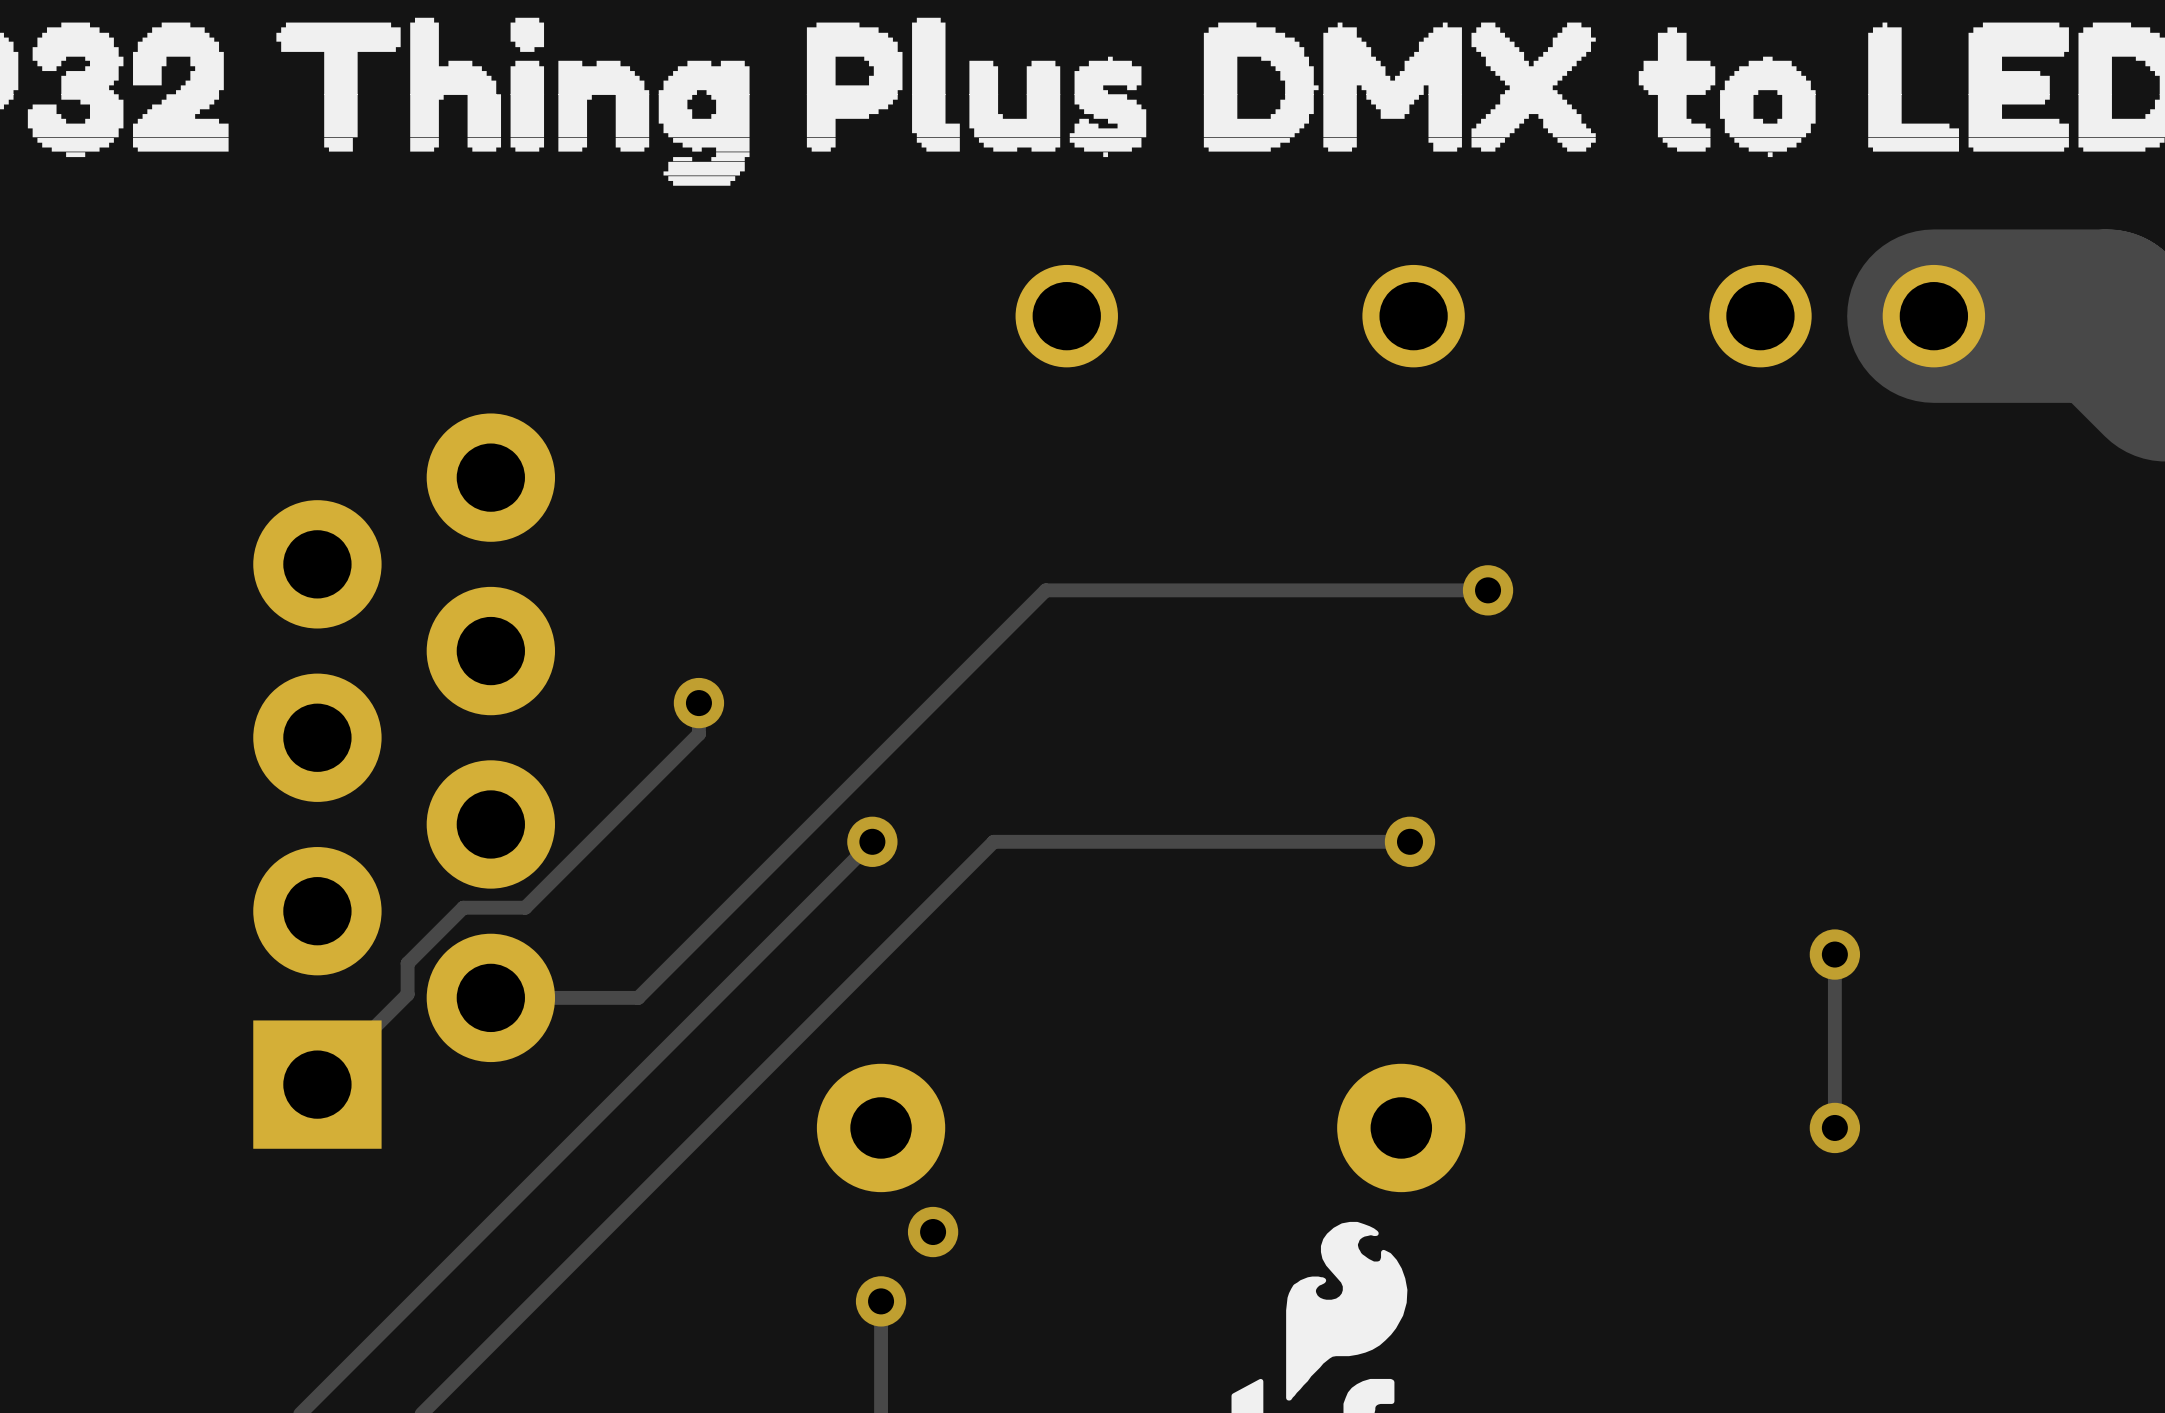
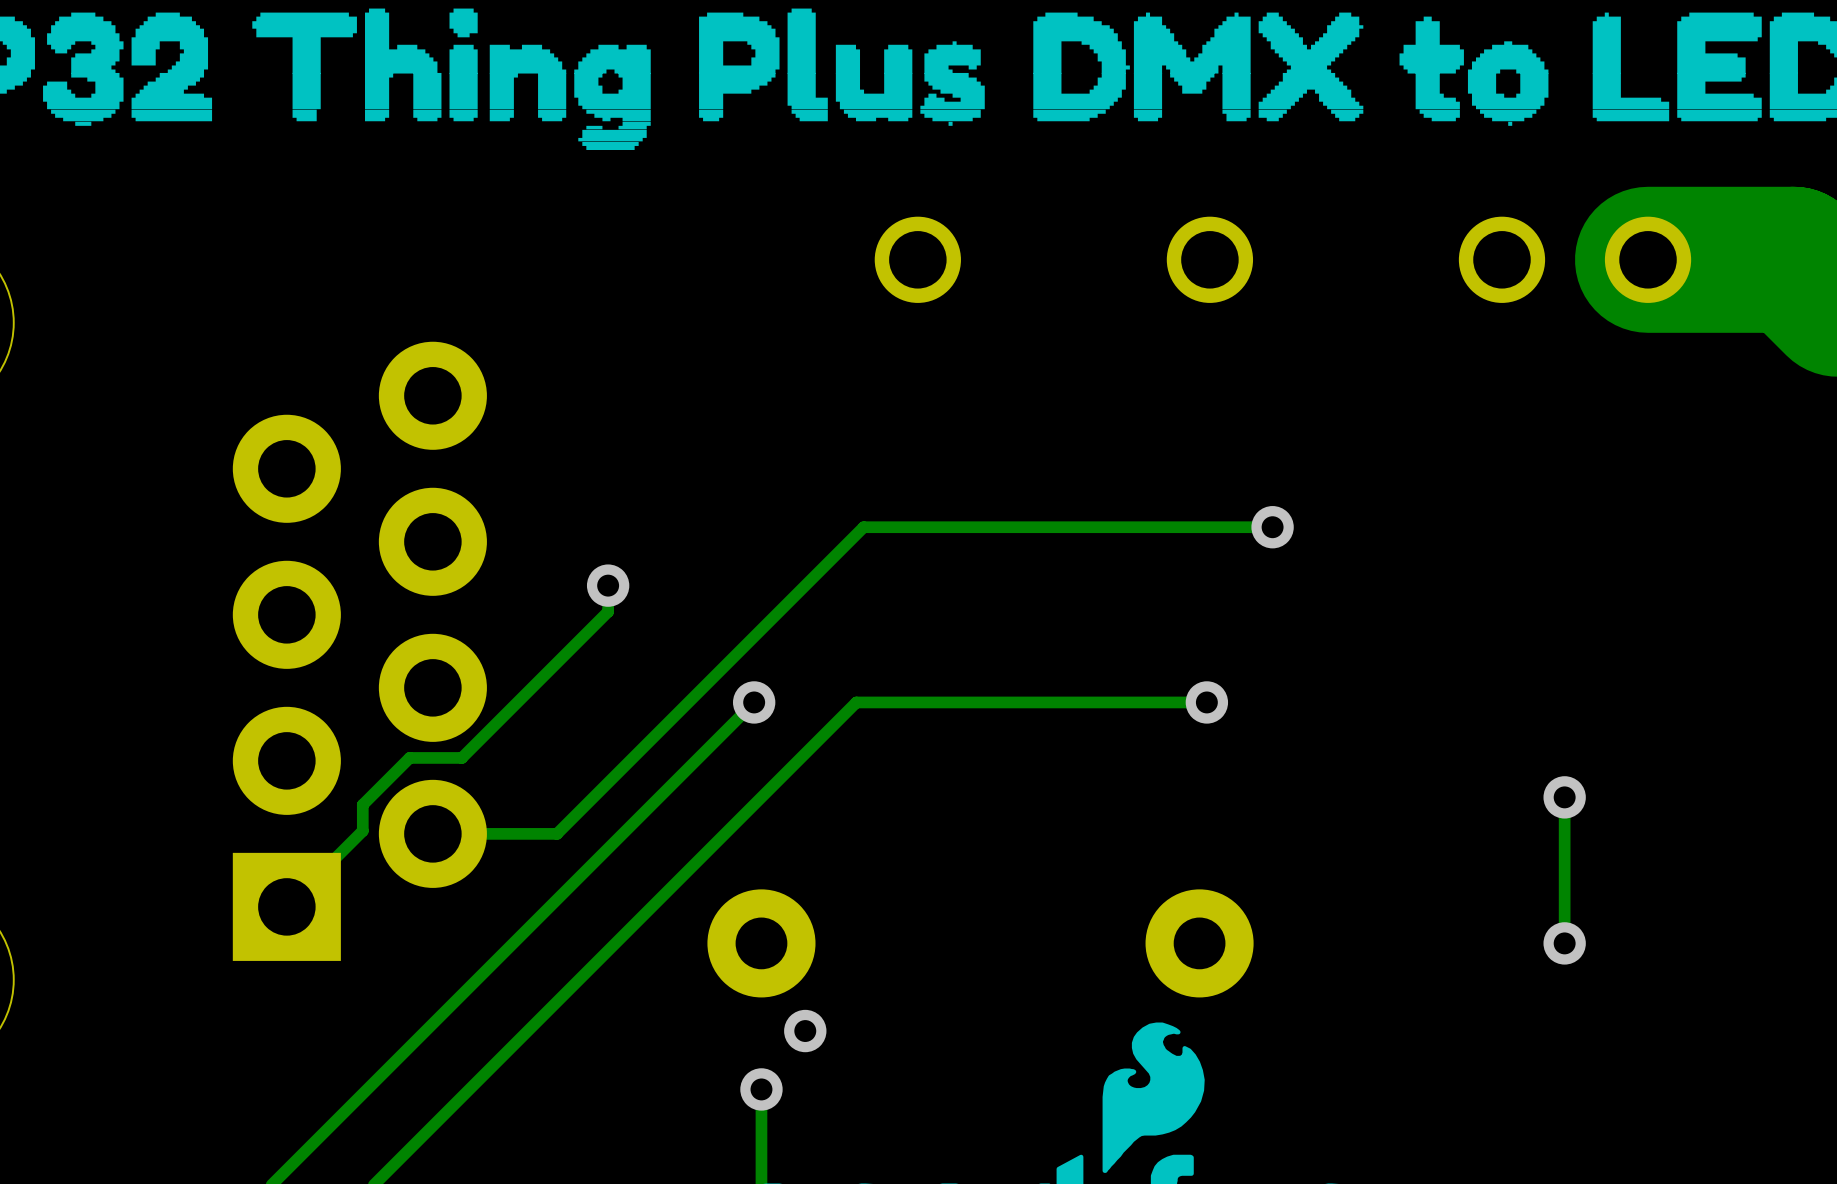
track: (1488, 590) (1045, 590) (1002, 633) -> (1272, 527) (863, 527)
via position: (1488, 590) -> (1272, 527)

